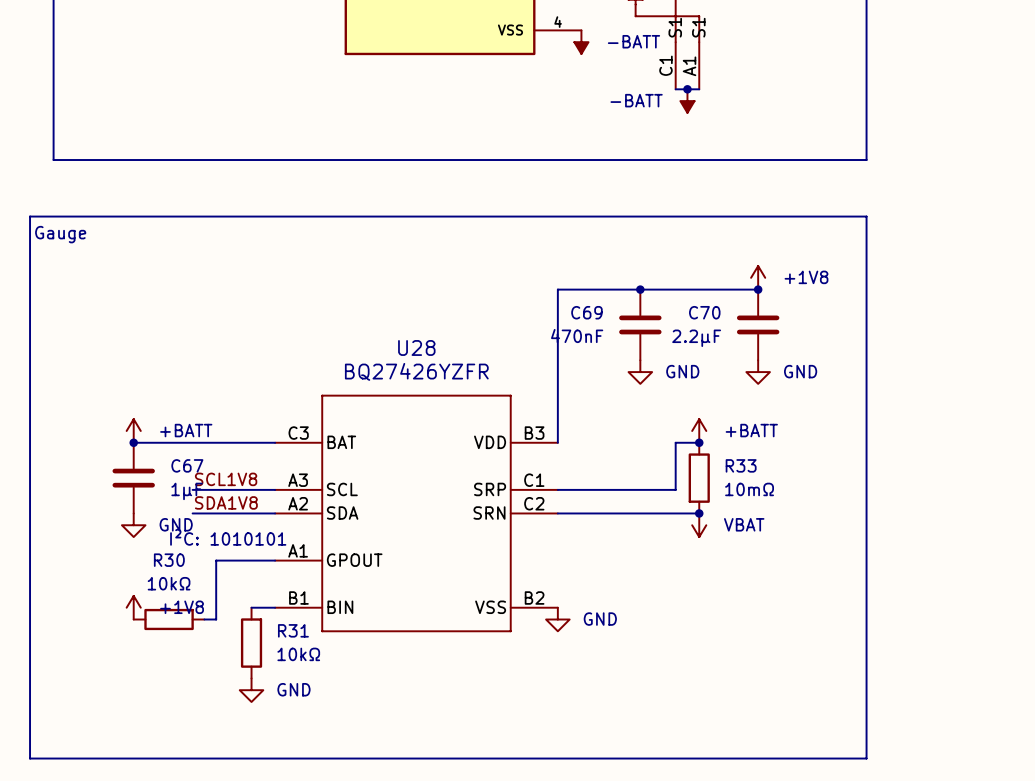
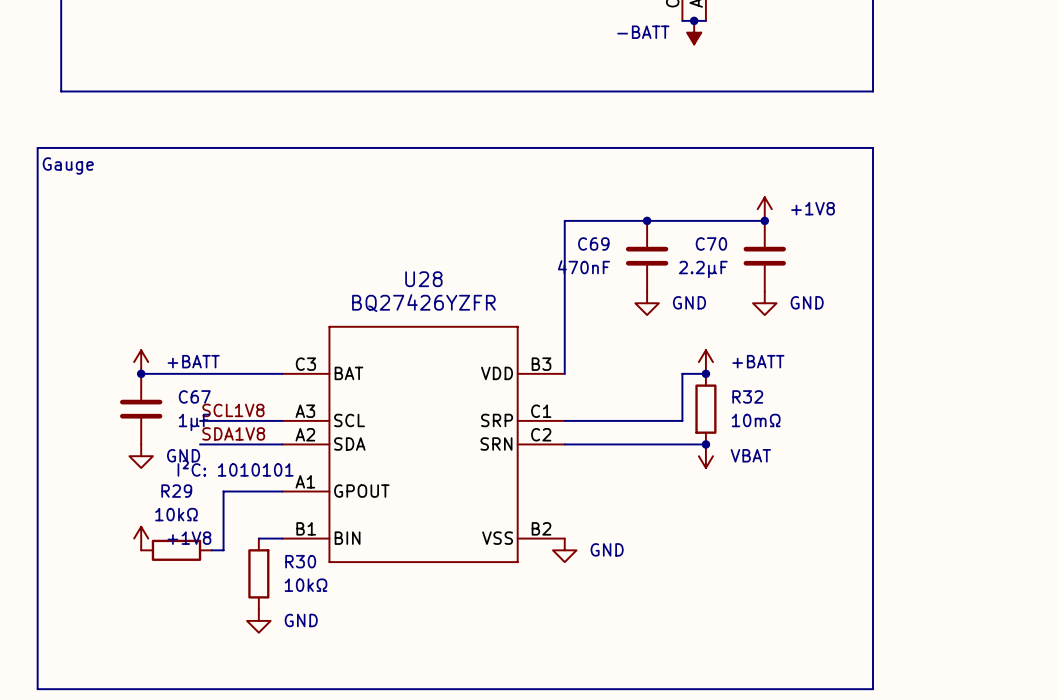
R33 name: R33 (741, 465) -> R32 (747, 396)
R30 name: R30 (169, 560) -> R29 (176, 491)
R31 name: R31 (293, 630) -> R30 (300, 561)

